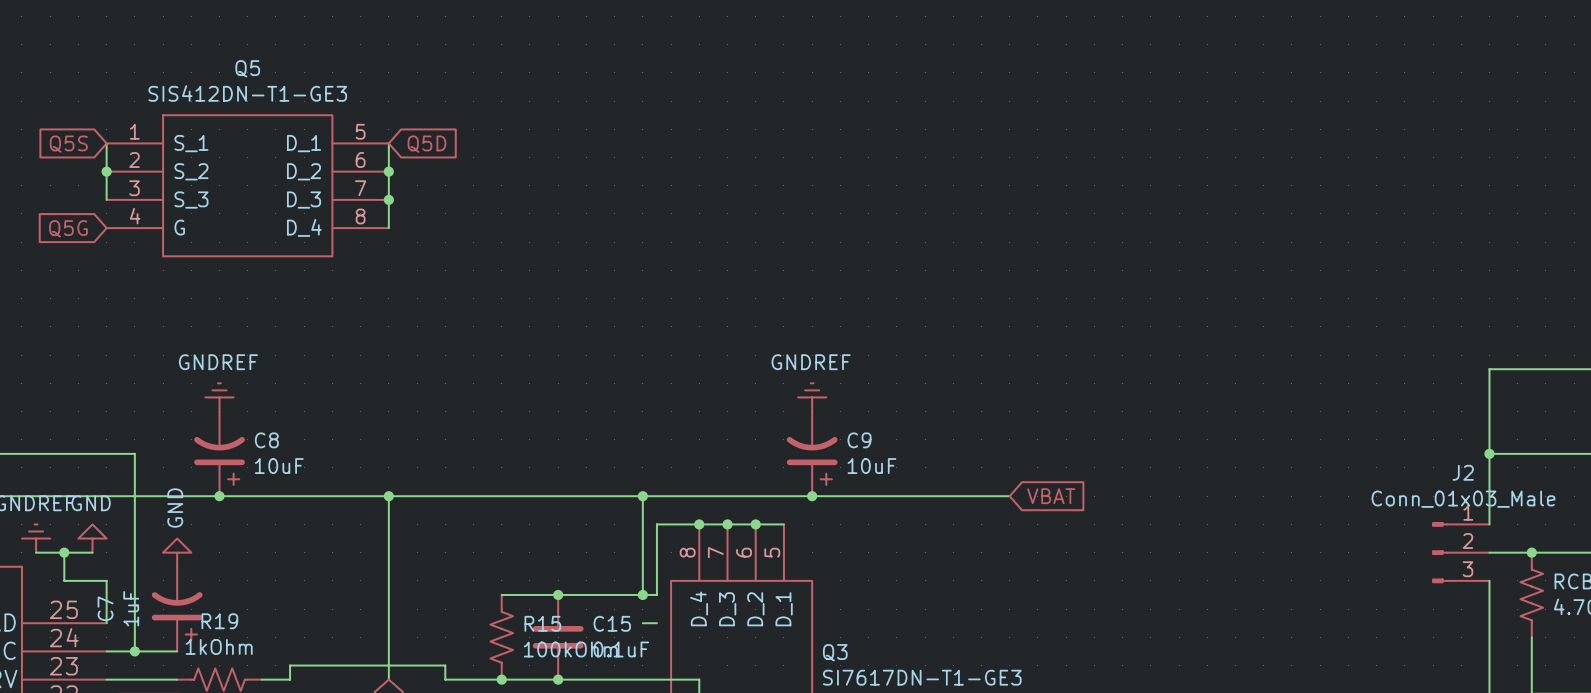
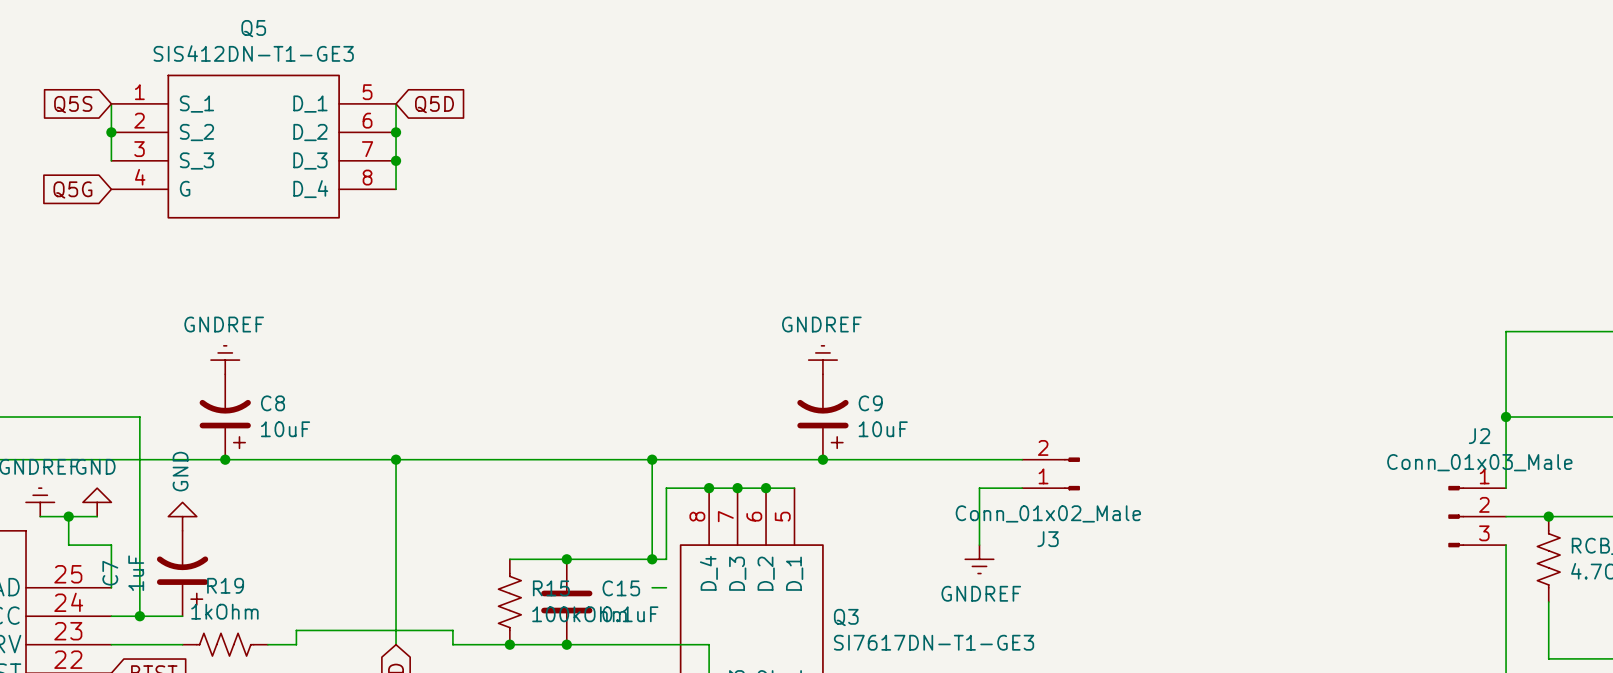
global label: VBAT (1051, 496) -> none
J3: none -> Conn_01x02_Male (1051, 473)
wire: none -> (1022, 488) (979, 488) (979, 545)
power symbol: none -> GNDREF (979, 559)

